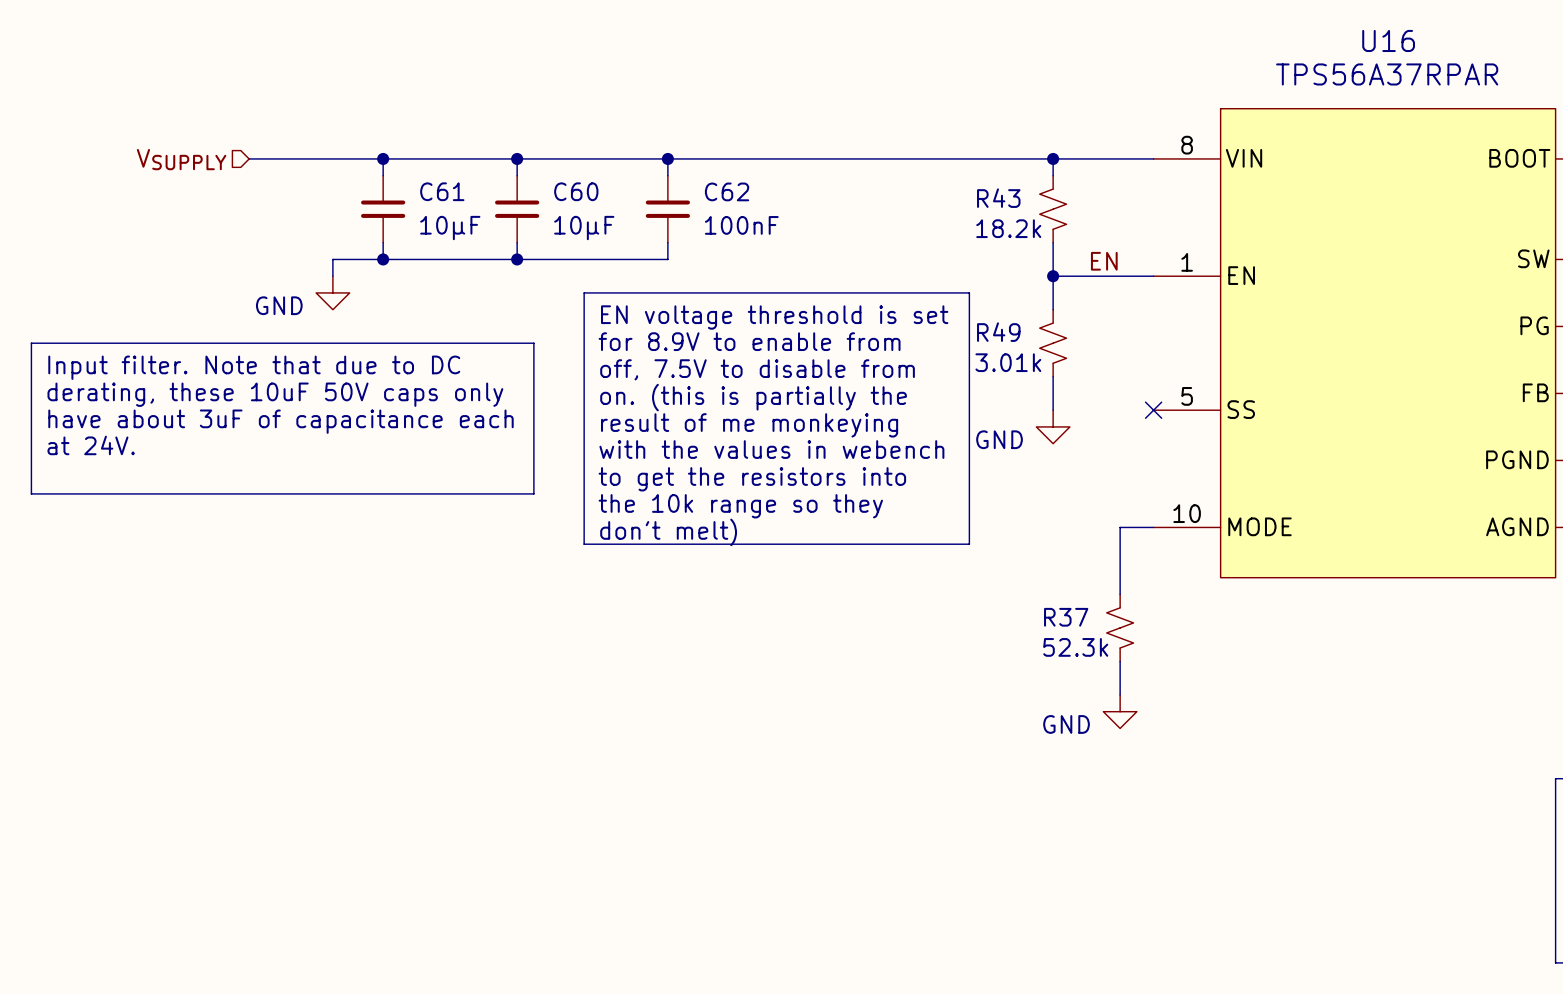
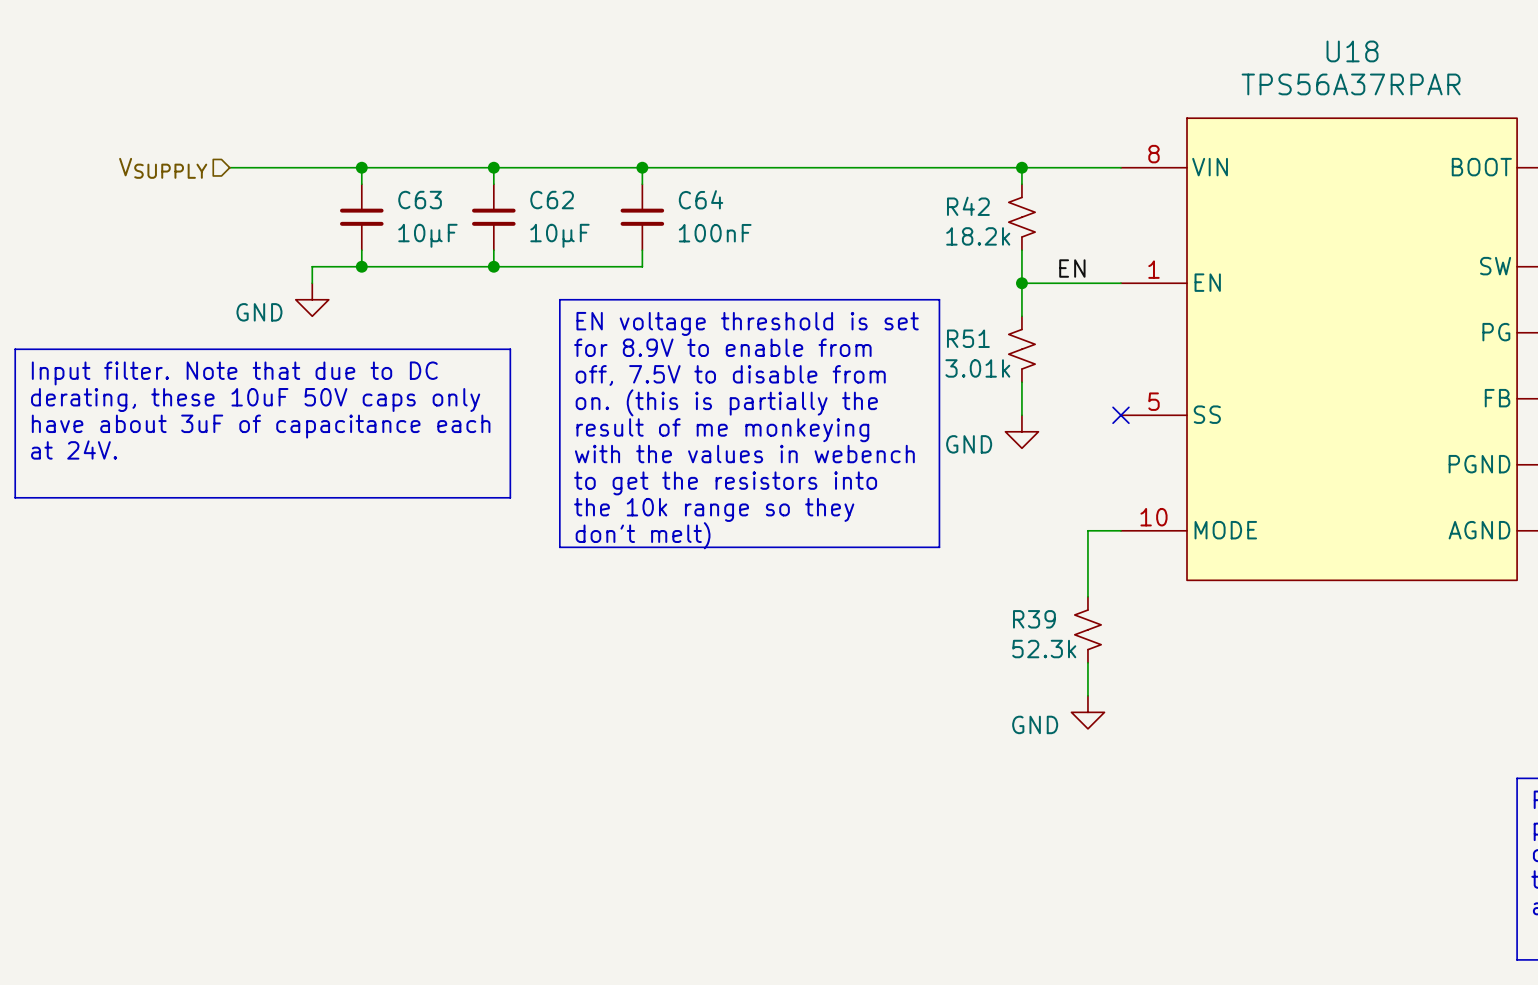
U16 name: U16 (1388, 40) -> U18 (1352, 51)
C61 name: C61 (442, 191) -> C63 (420, 200)
C60 name: C60 (576, 191) -> C62 (552, 200)
C62 name: C62 (727, 191) -> C64 (701, 199)
R43 name: R43 (998, 198) -> R42 (968, 206)
R49 name: R49 (998, 332) -> R51 (968, 338)
R37 name: R37 (1066, 617) -> R39 (1034, 619)

